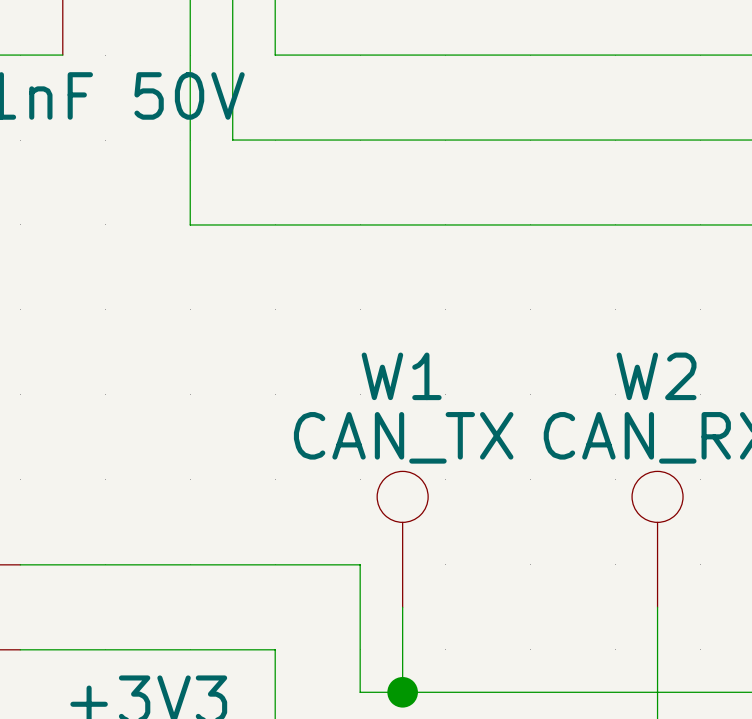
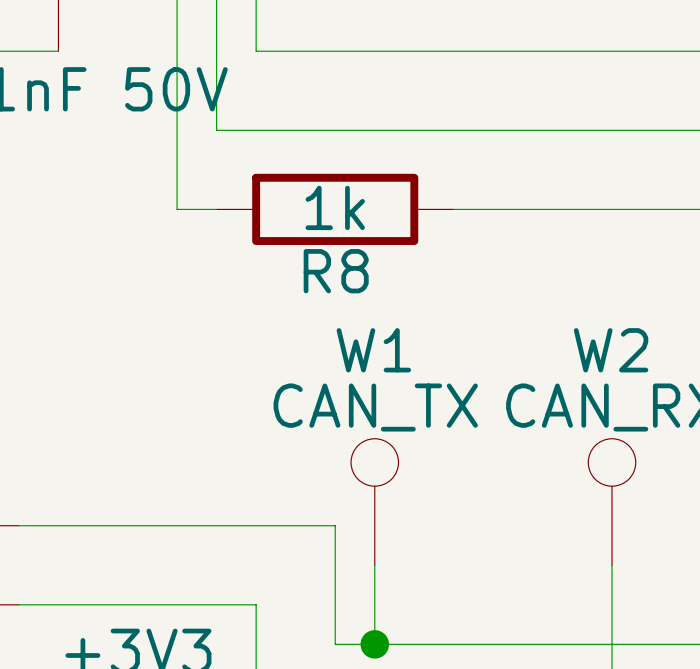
wire: (232, 224) (487, 224) -> none
R8: none -> 1k (335, 209)

